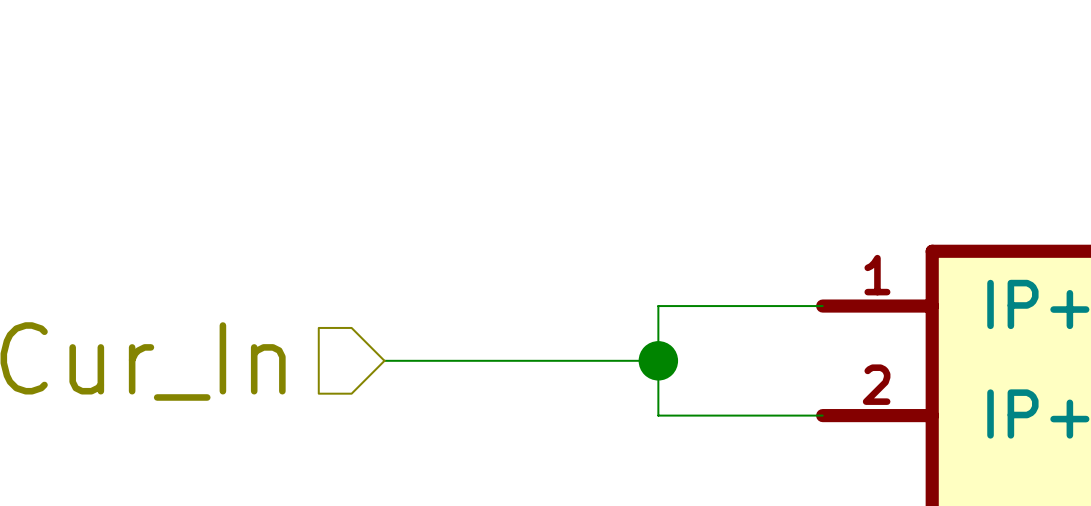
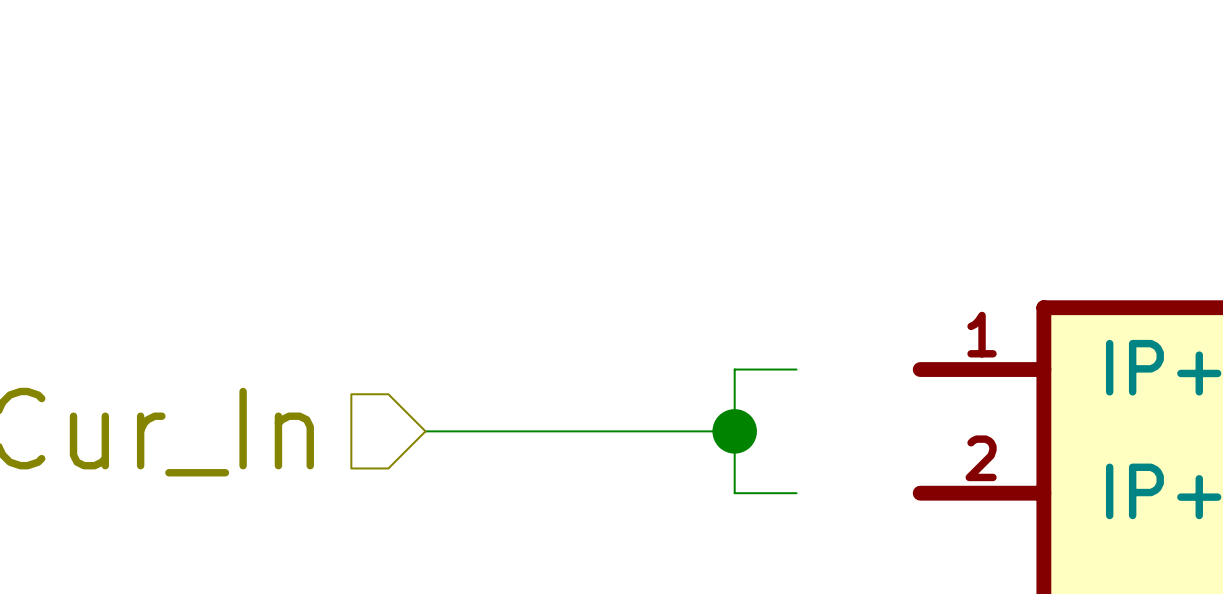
wire: (713, 306) (822, 306) -> none
wire: (713, 415) (822, 415) -> none

